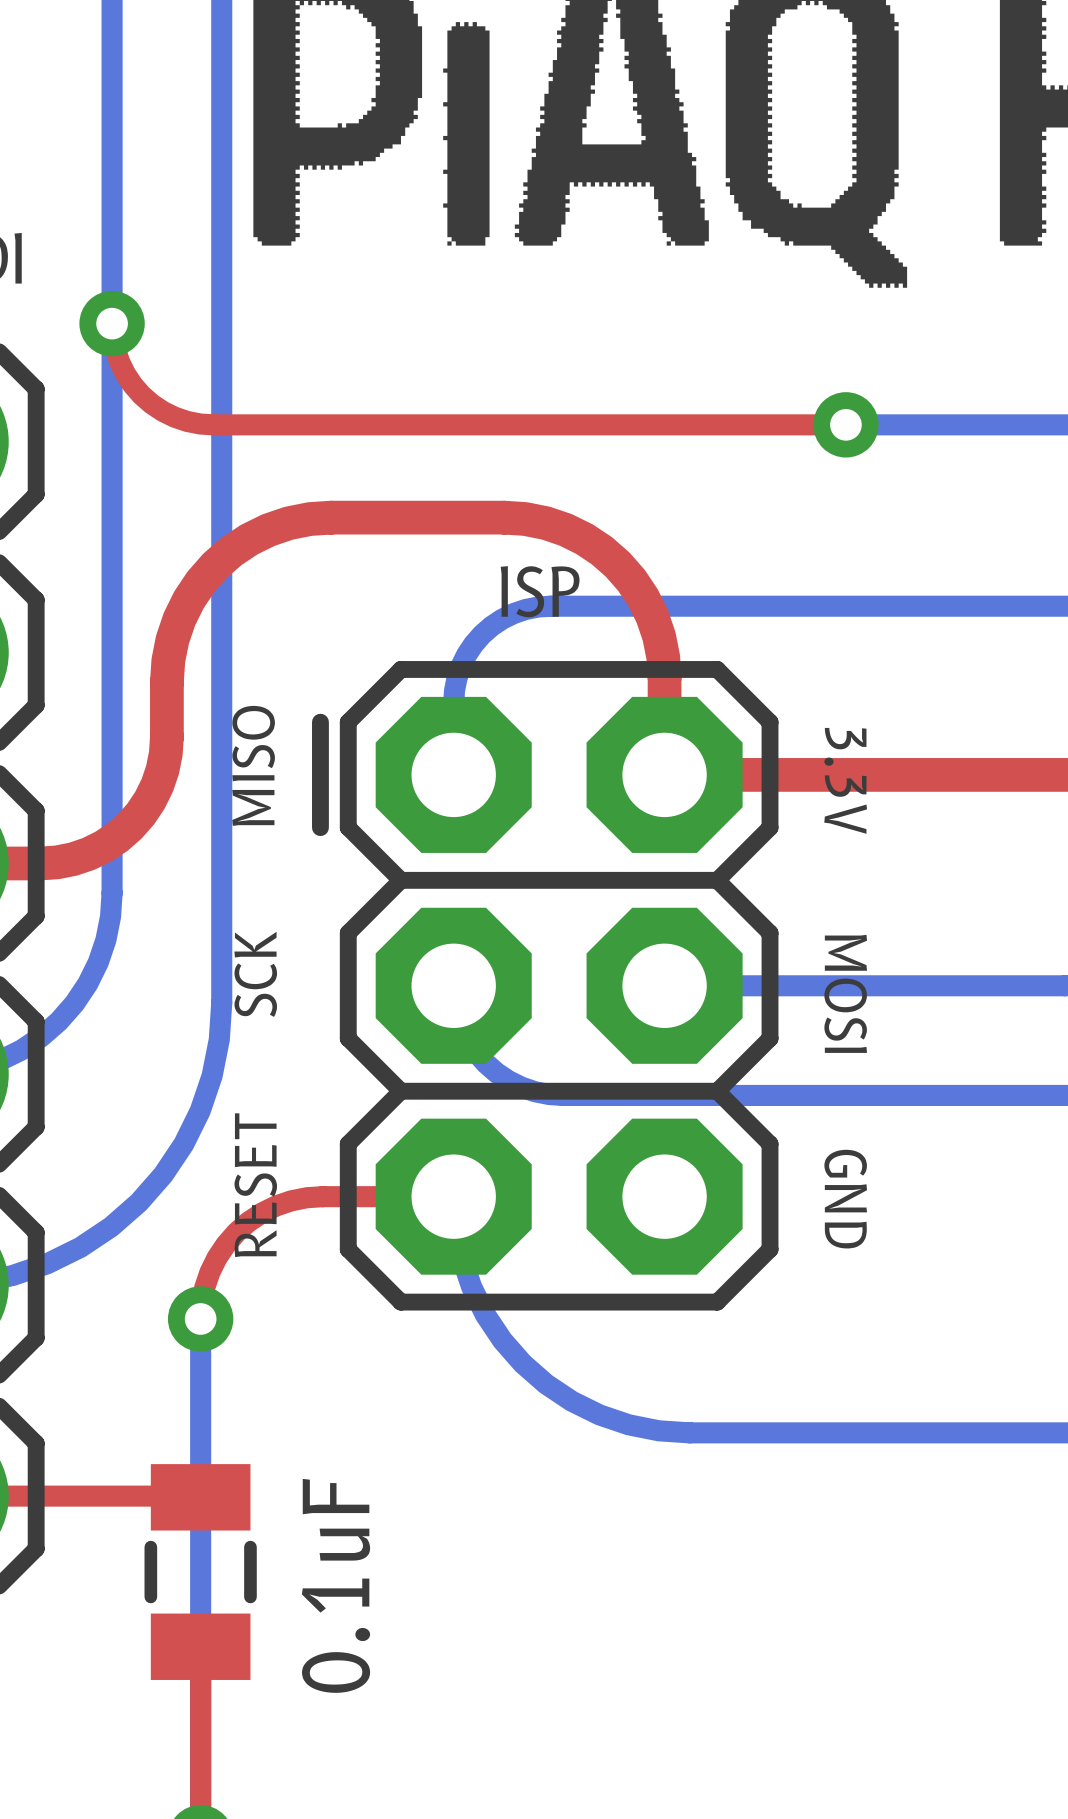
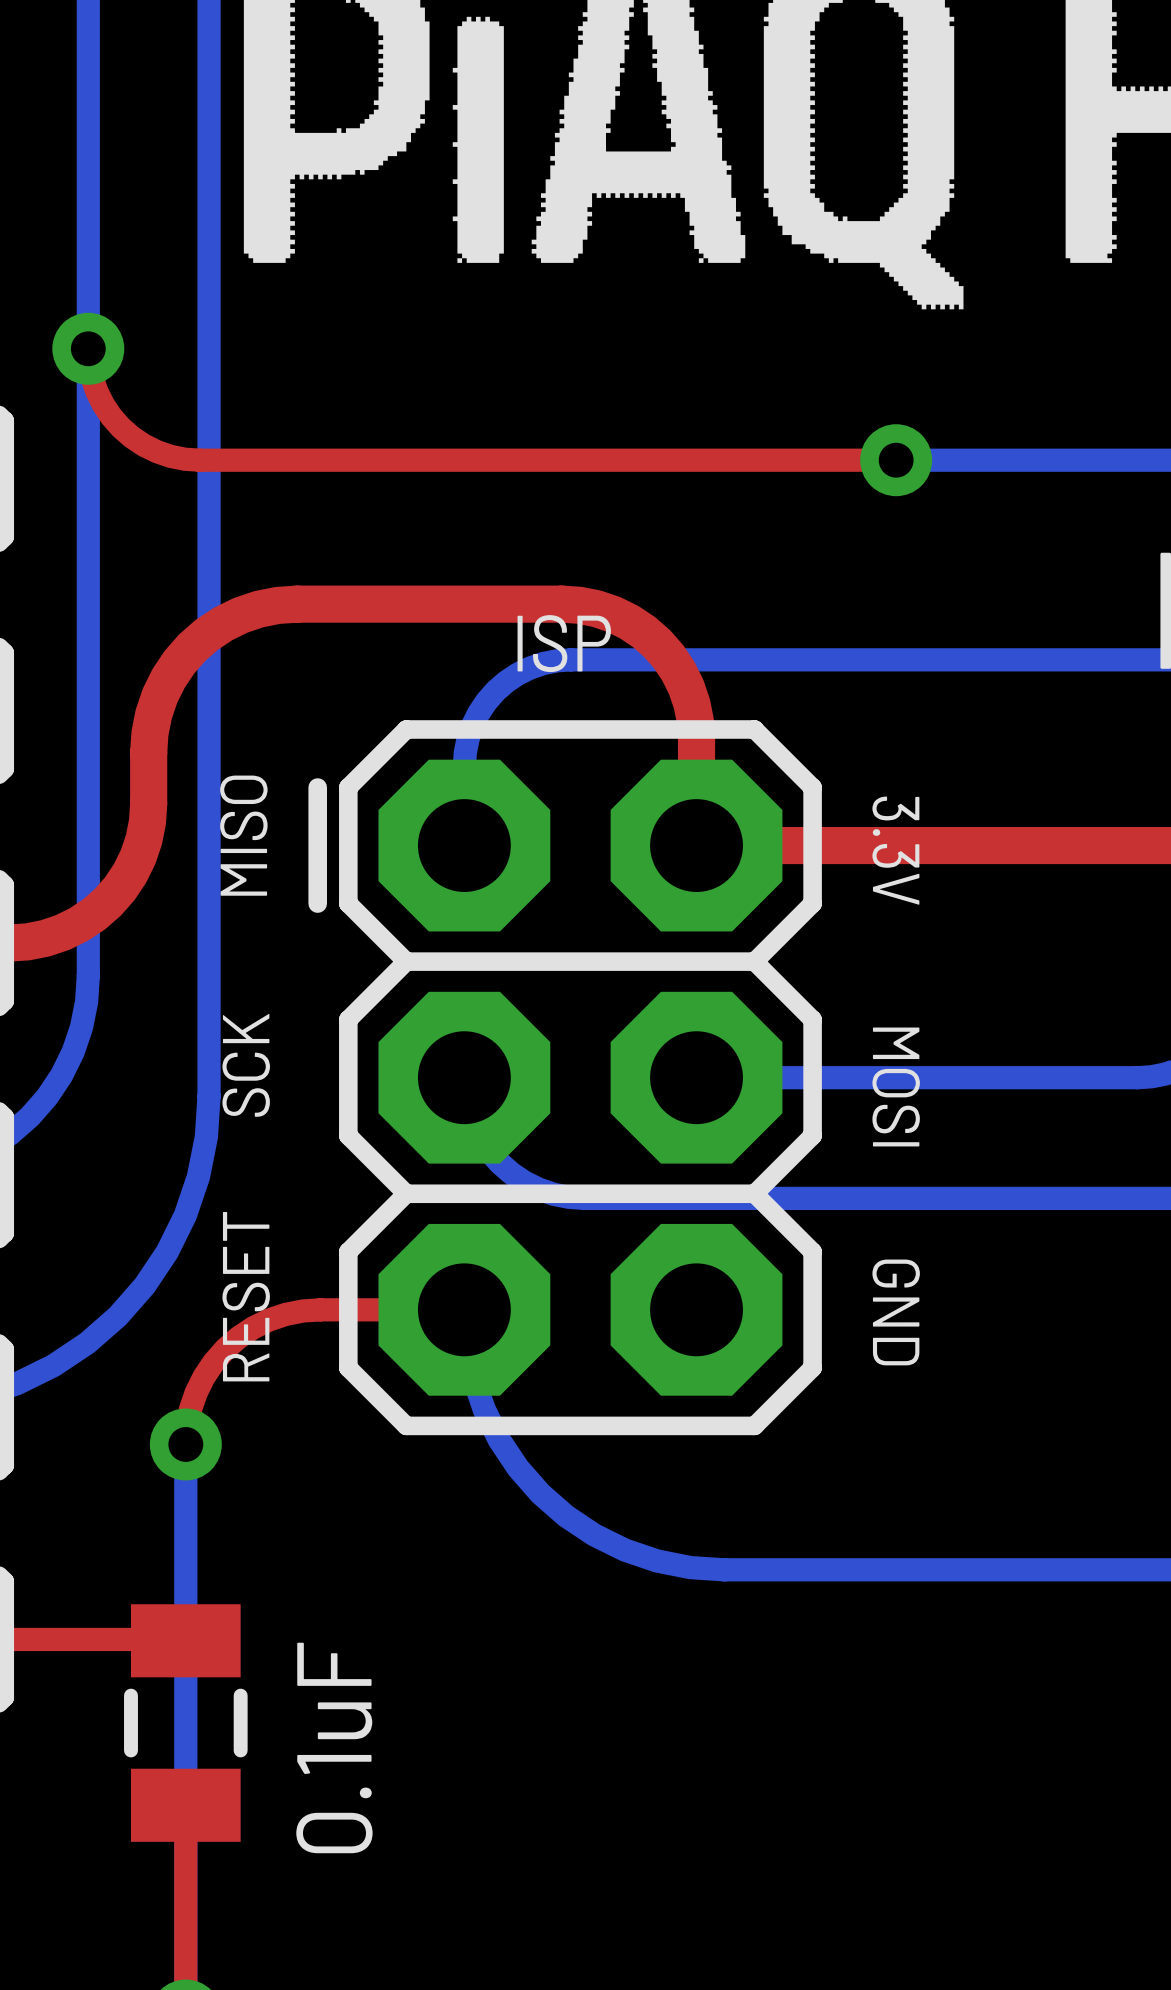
top track: (664, 677) (659, 636) (643, 597) (617, 564) (584, 539) (565, 529) (525, 519) (504, 517) (331, 517) (288, 523) (268, 530) (231, 551) (215, 565) (188, 599) (179, 619) (168, 660) (166, 690) -> (696, 738) (691, 703) (678, 671) (668, 656) (657, 643) (629, 622) (596, 608) (561, 604) (297, 604) (277, 605) (240, 615) (222, 624) (192, 647) (168, 678) (159, 695) (153, 714) (148, 752)

